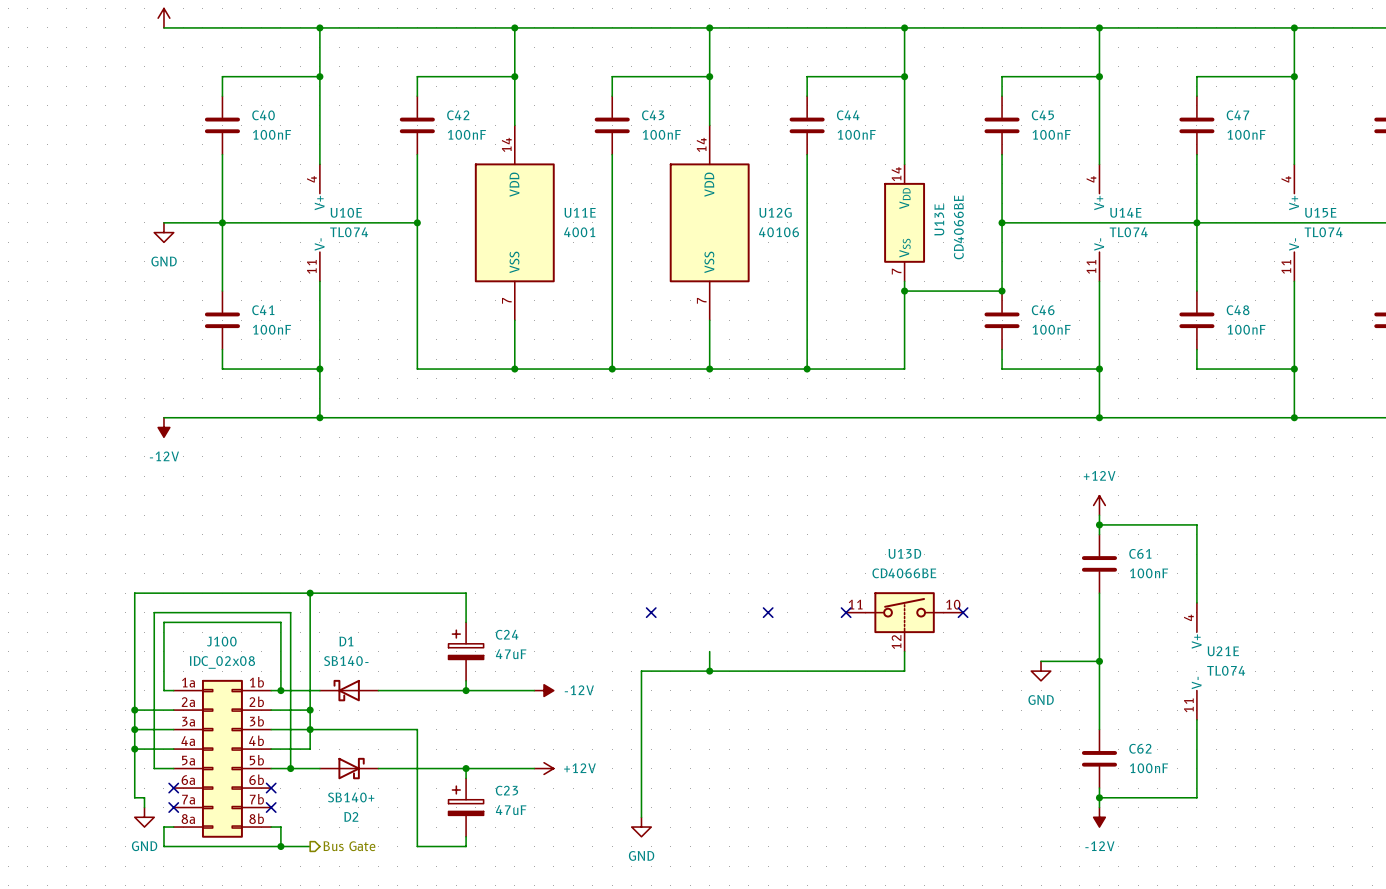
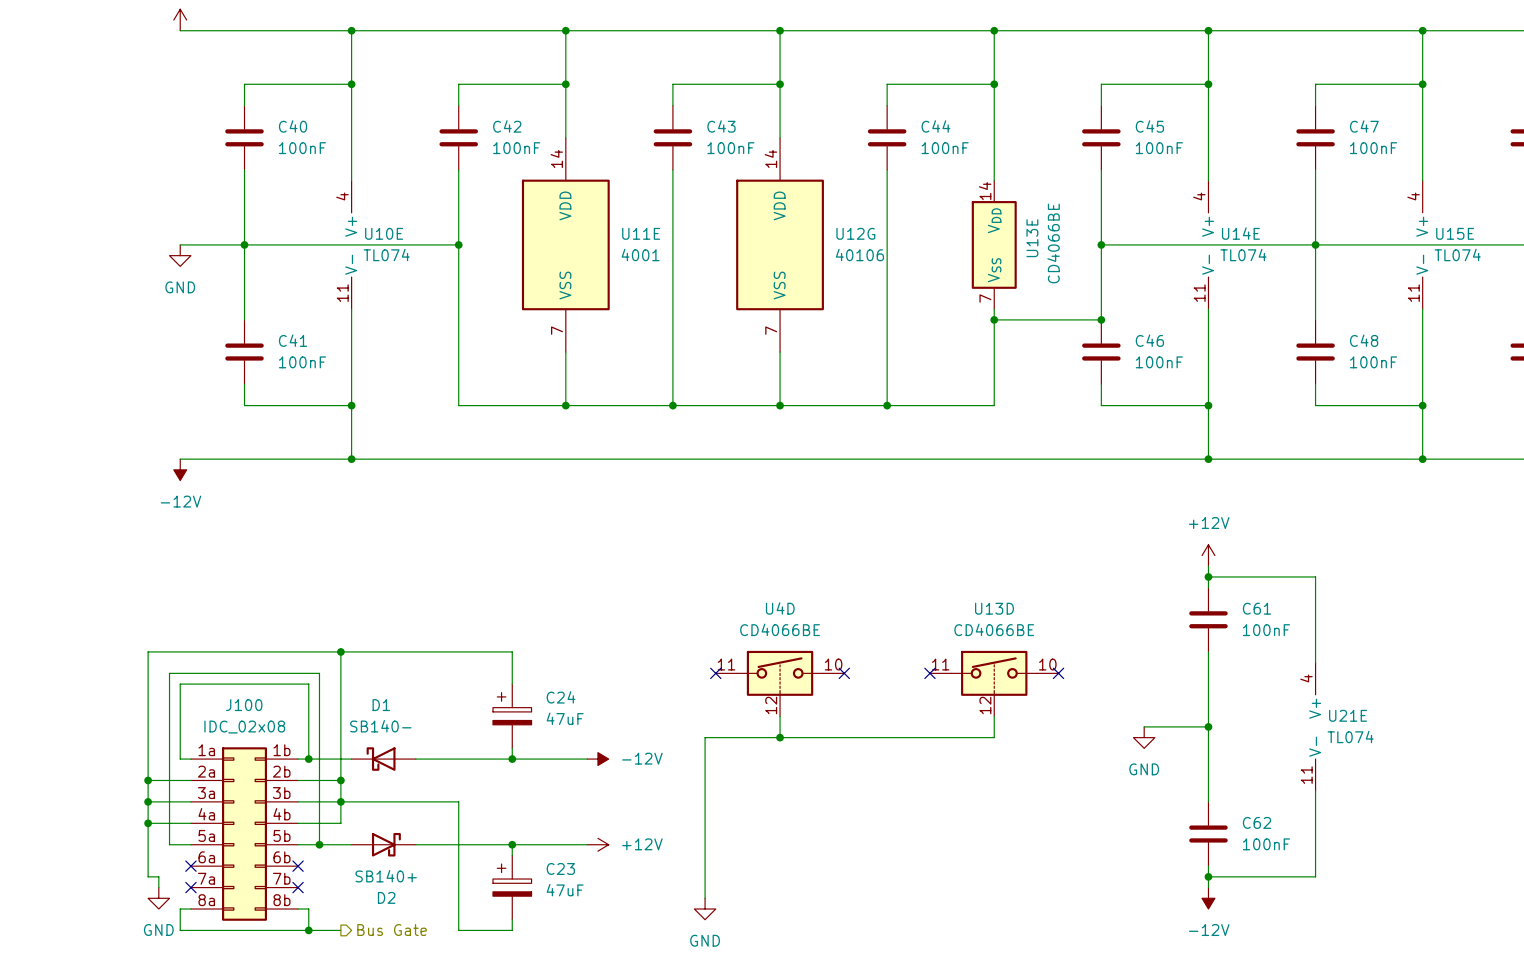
U4D: none -> CD4066BE (780, 683)

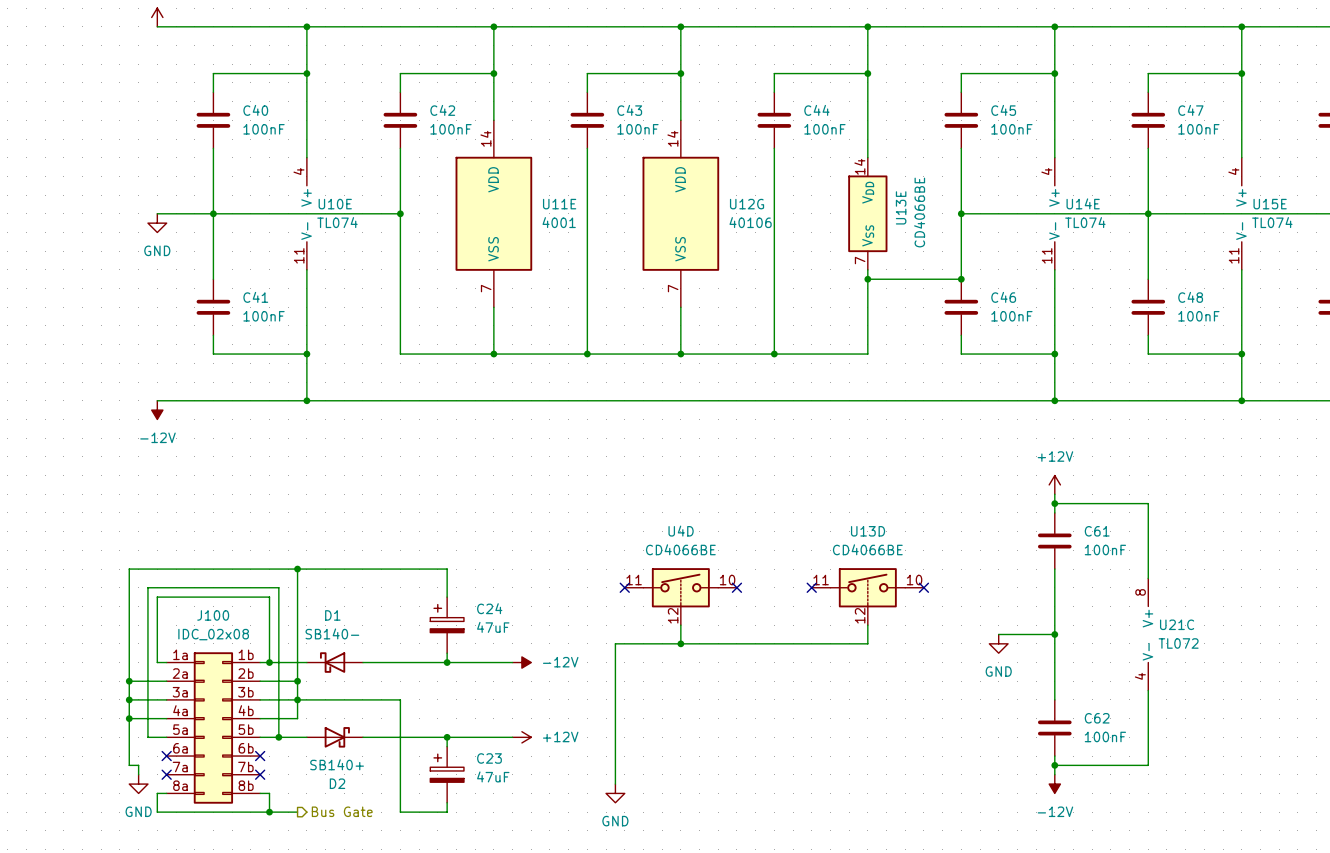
U21E pin number: 4 (1306, 678) -> 8 (1140, 592)
U21E name: U21E (1348, 715) -> U21C (1177, 624)
U21E value: TL074 (1350, 736) -> TL072 (1178, 643)
U21E pin number: 11 (1306, 775) -> 4 (1140, 676)

